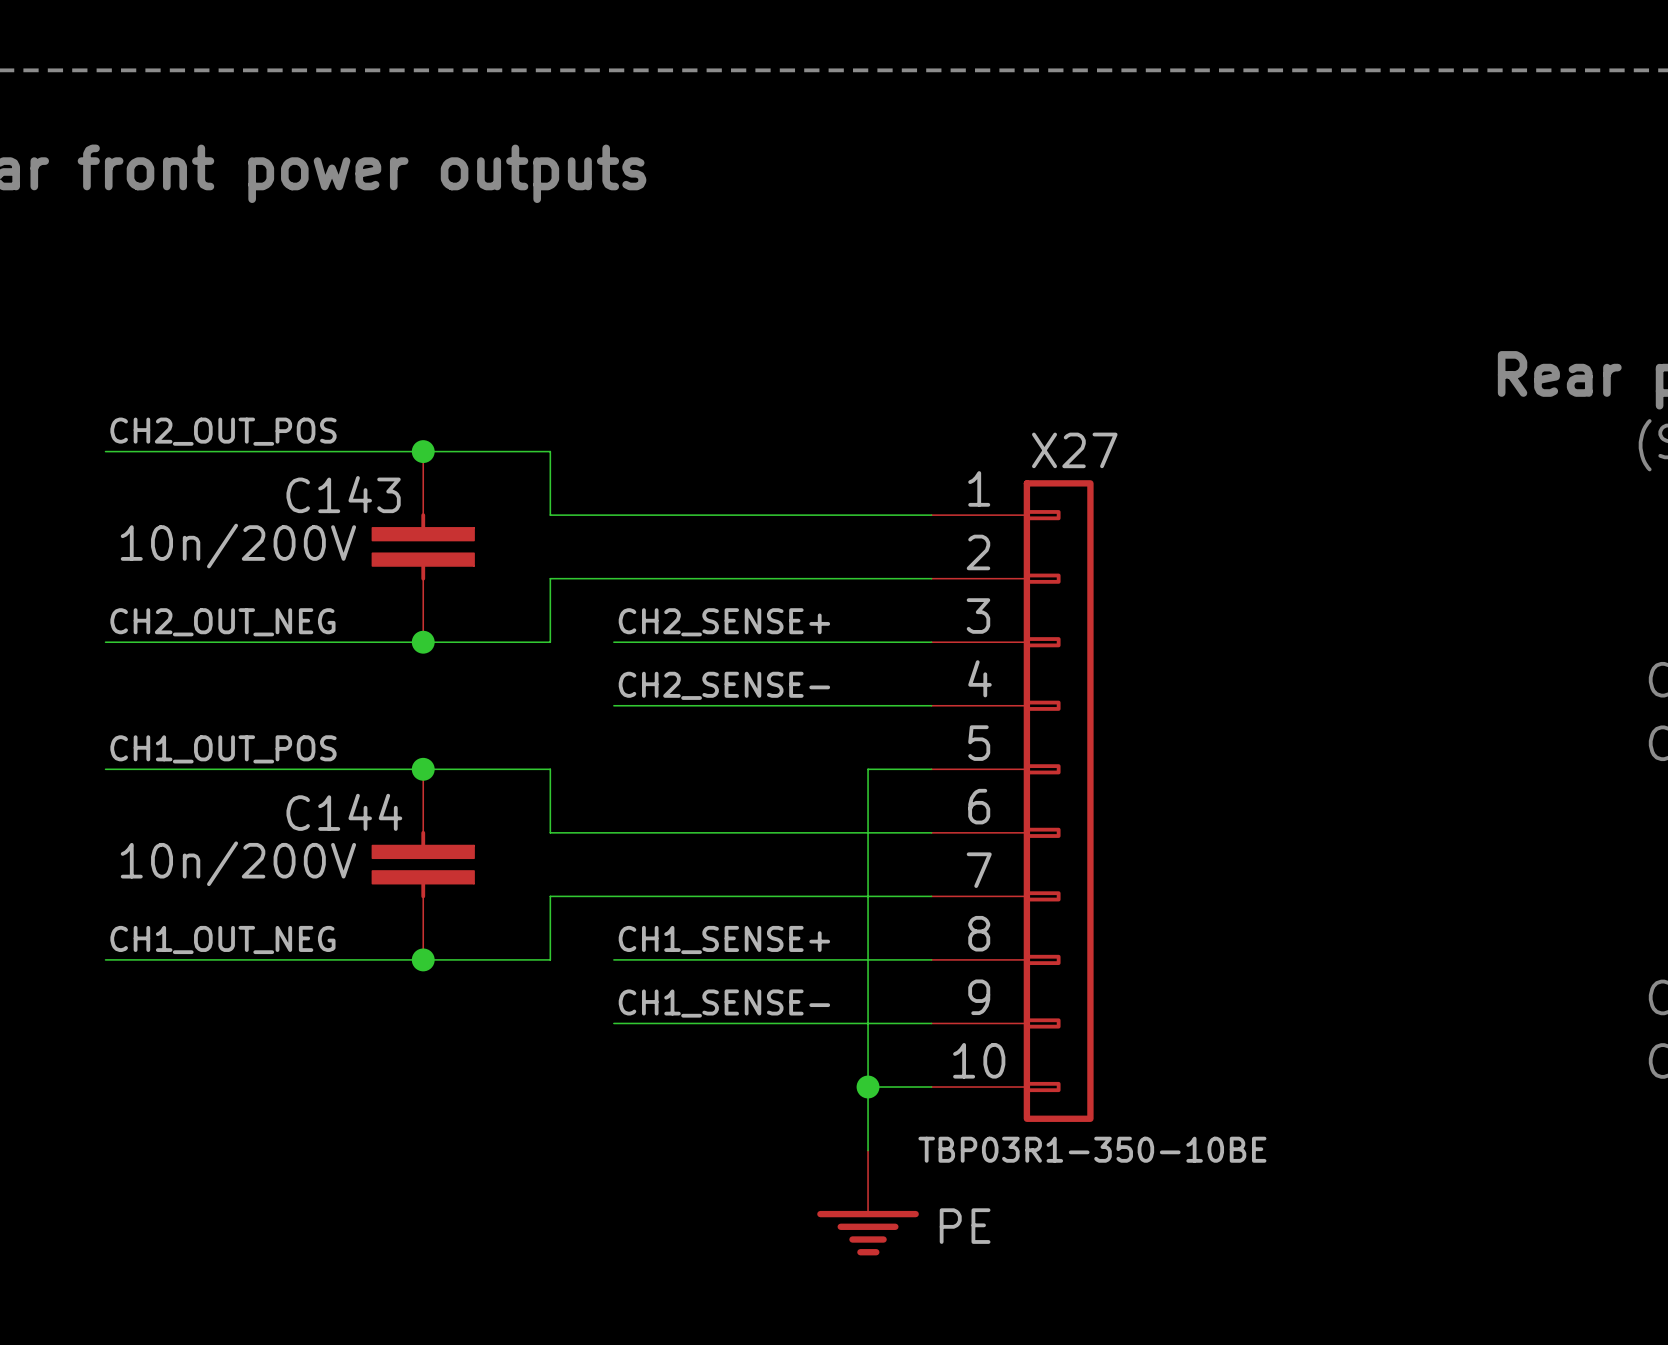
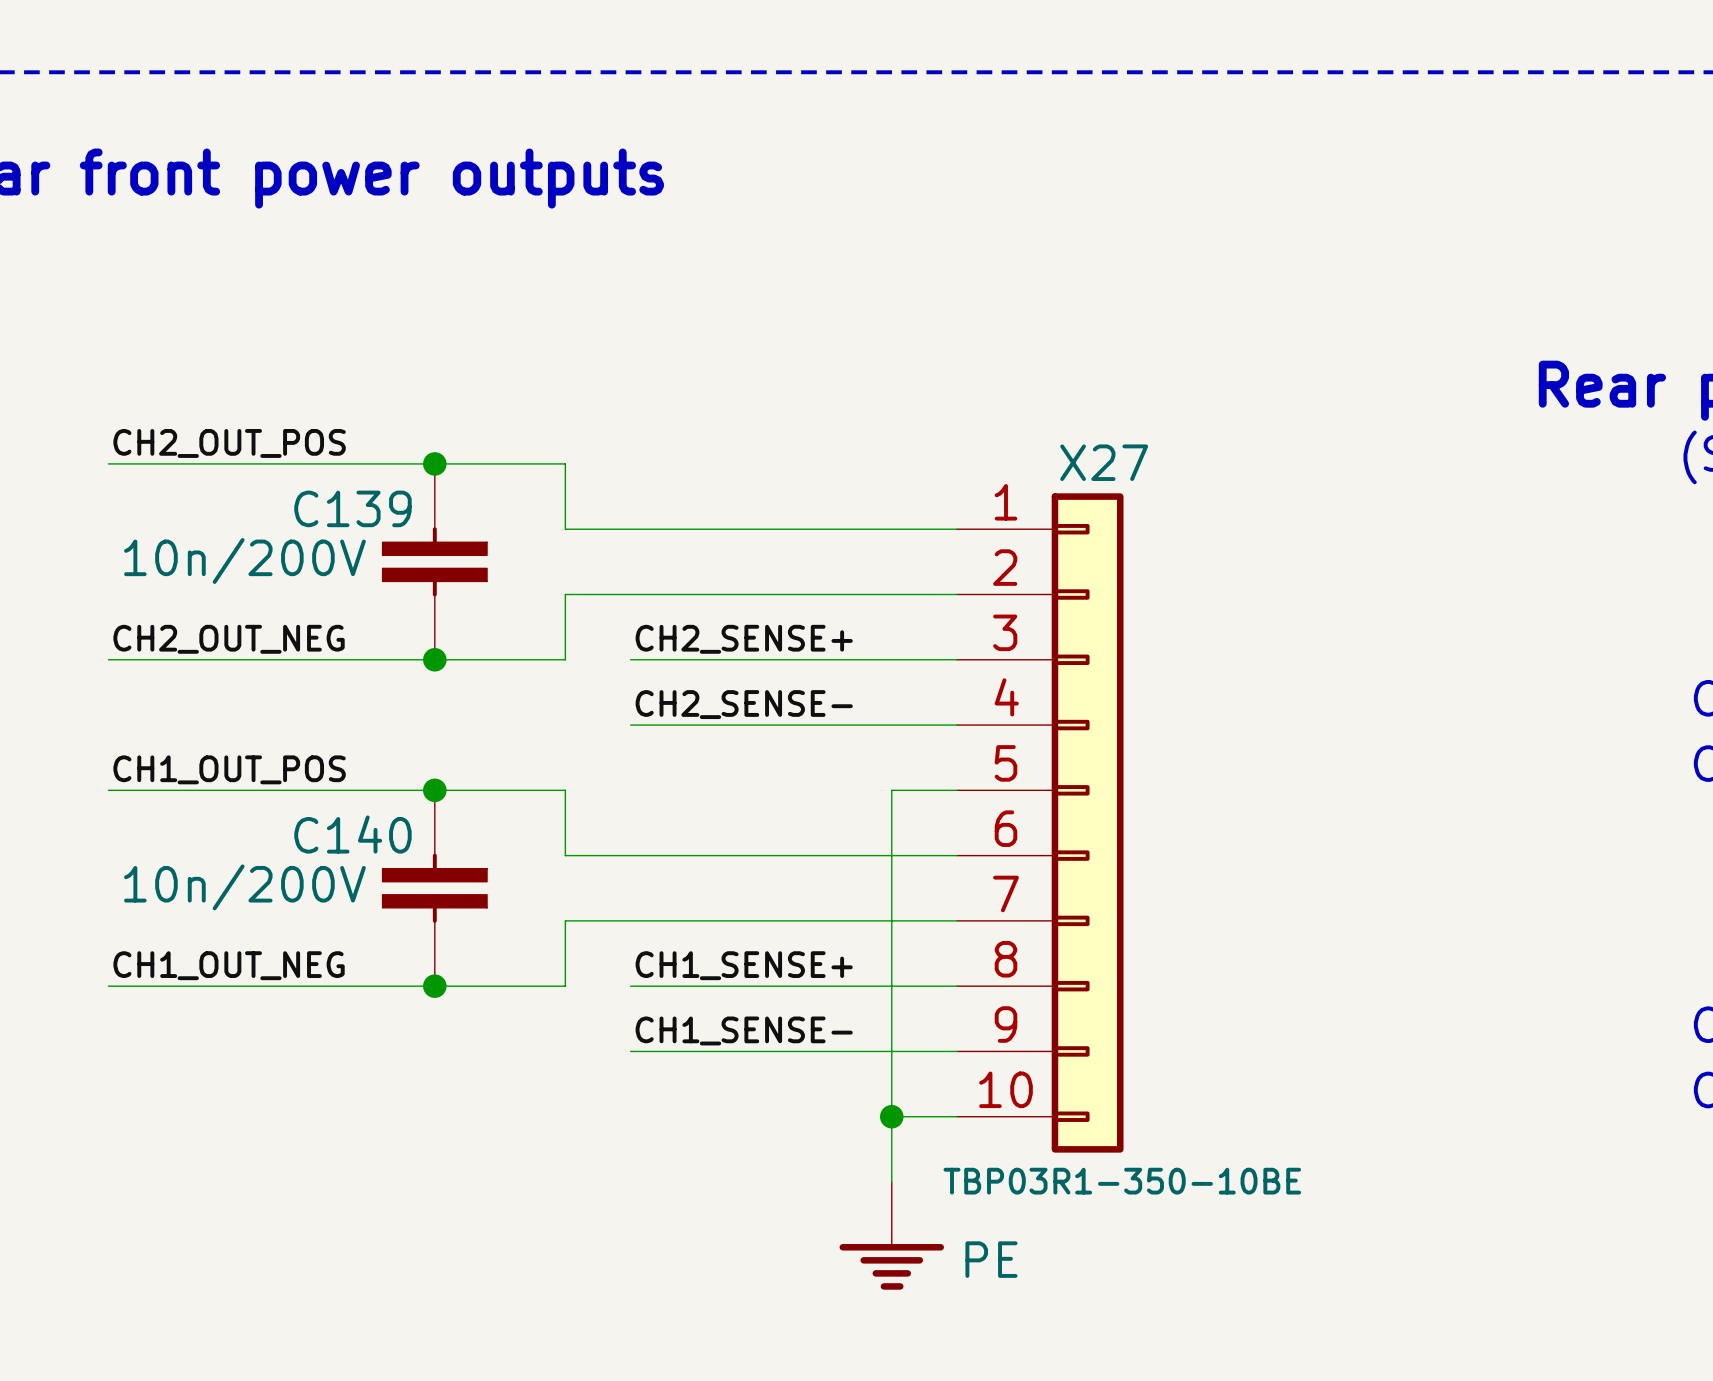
C143 name: C143 (343, 494) -> C139 (352, 508)
C144 name: C144 (344, 812) -> C140 (352, 834)

